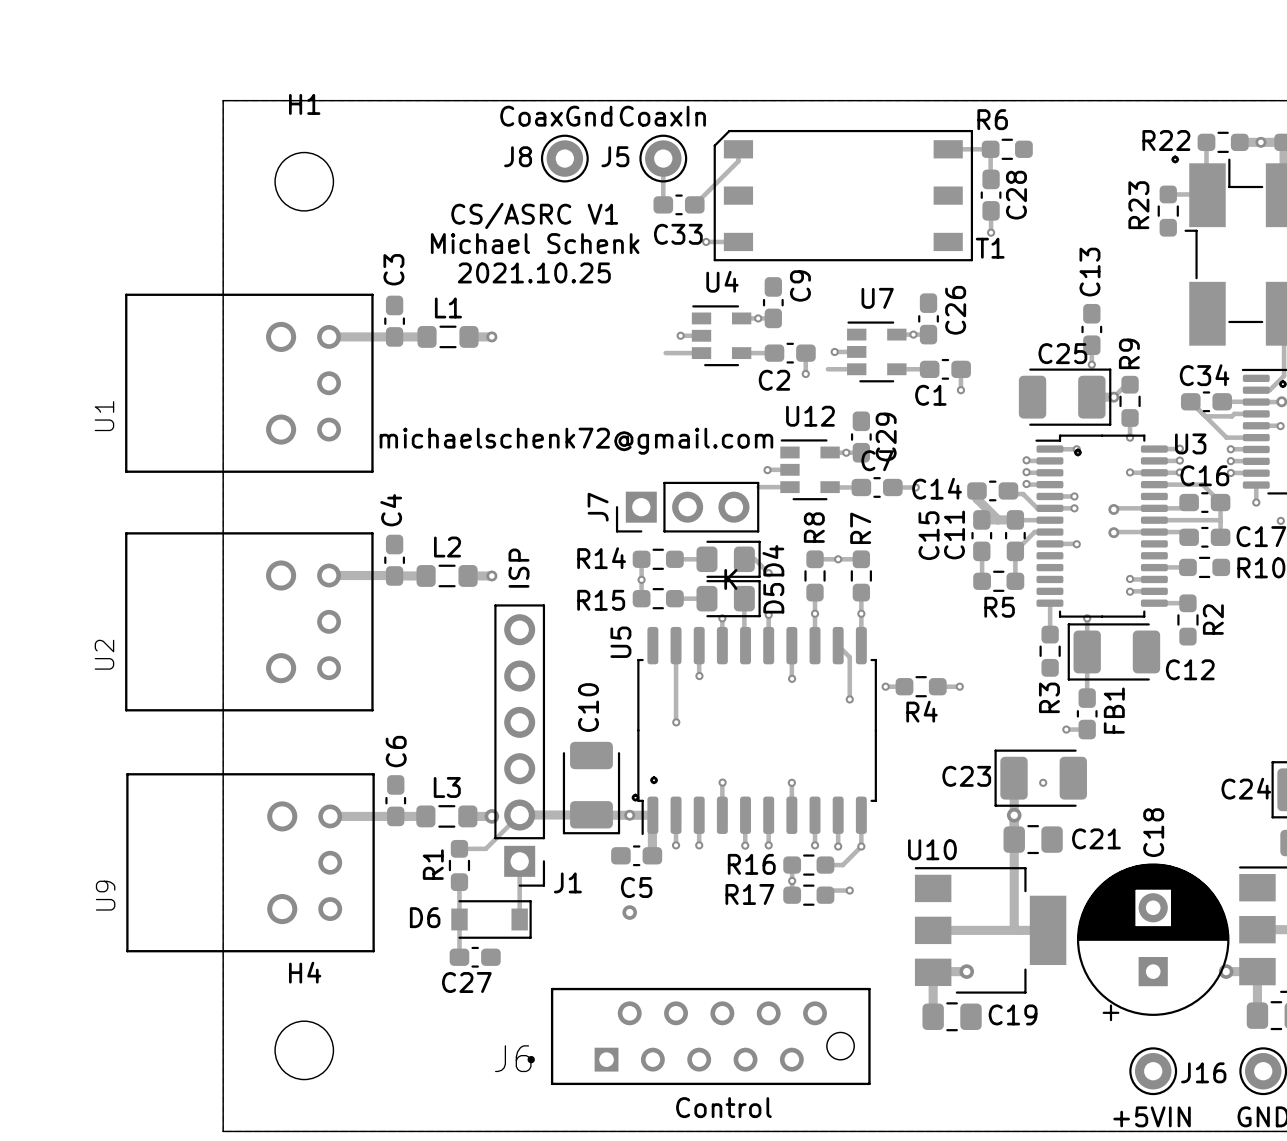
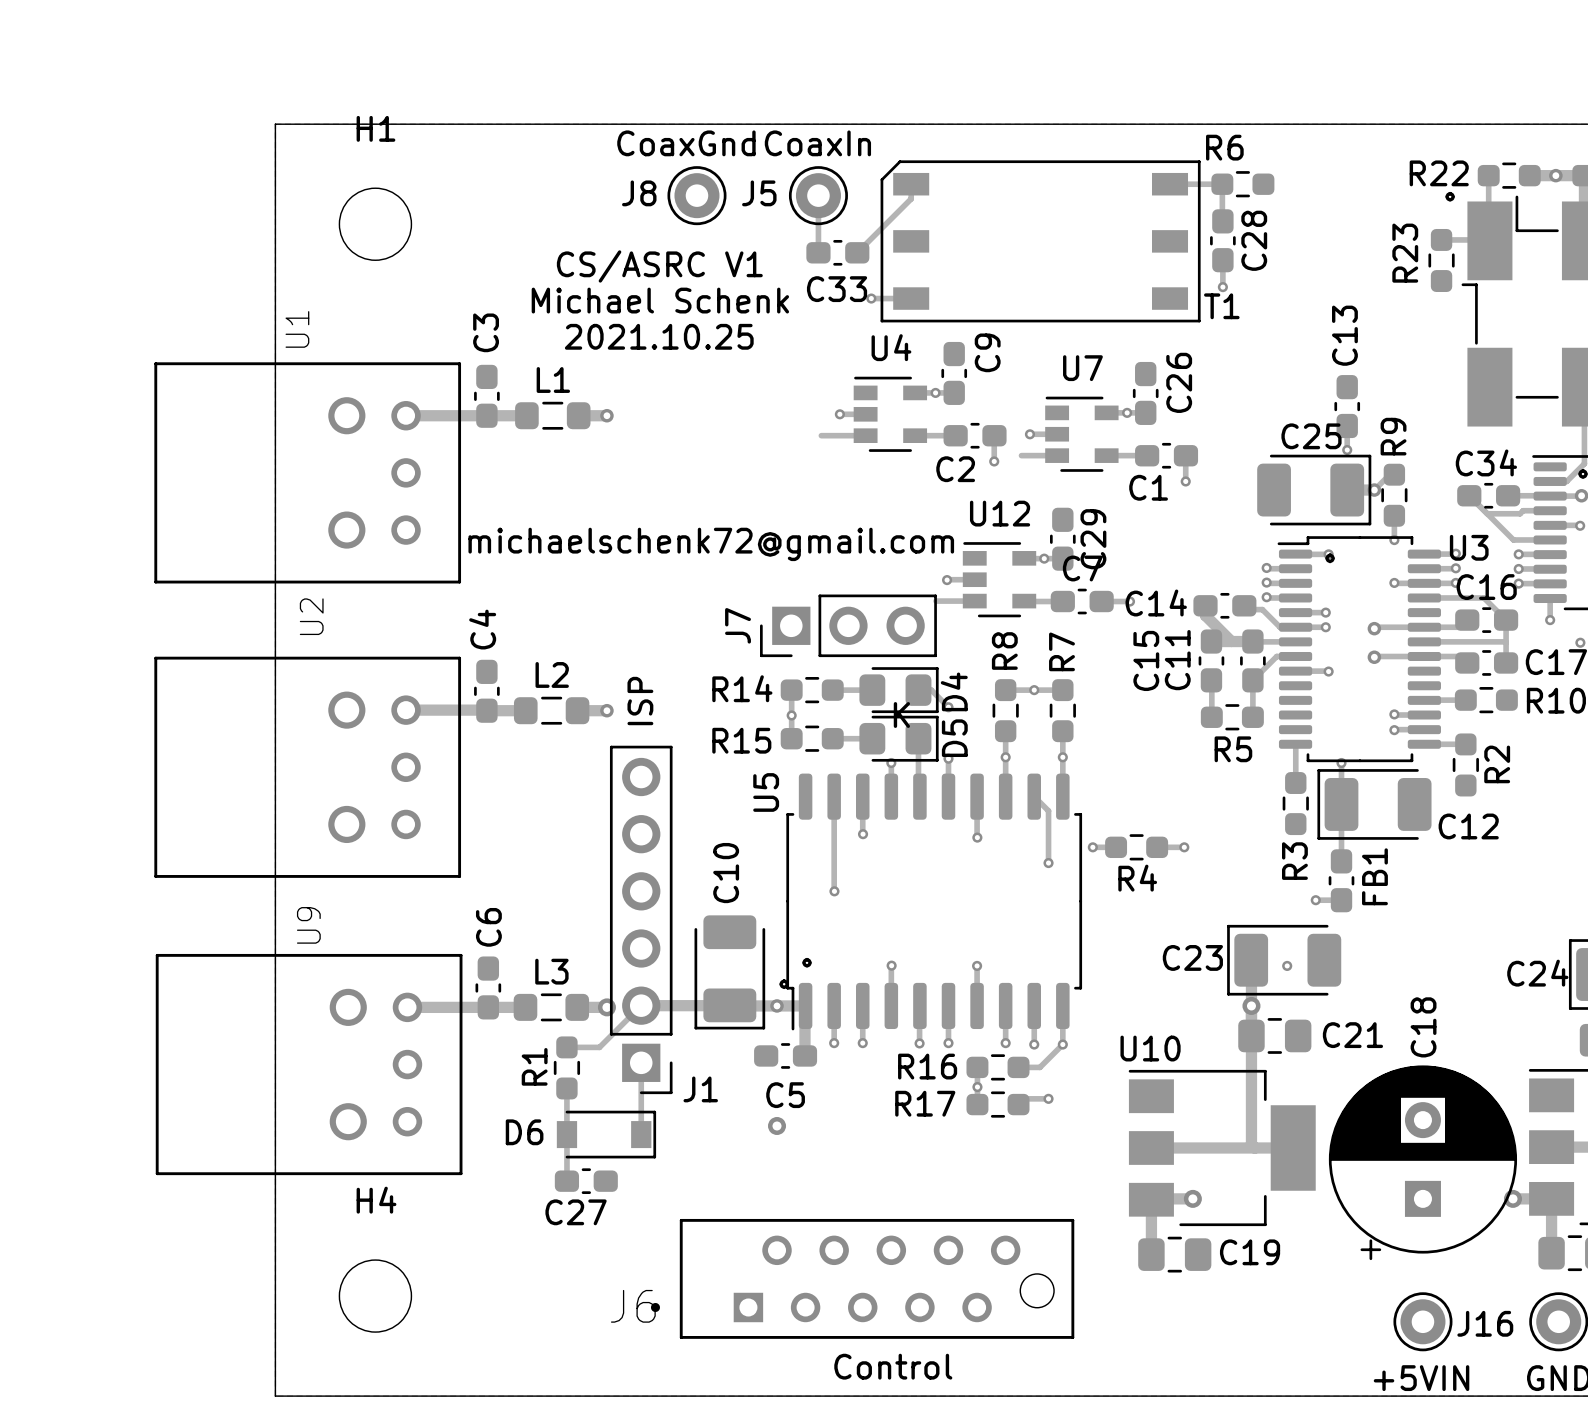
U1 name position: U1 (104, 416) -> U1 (297, 329)
U2 name position: U2 (104, 654) -> U2 (311, 616)
U9 name position: U9 (105, 895) -> U9 (308, 925)

